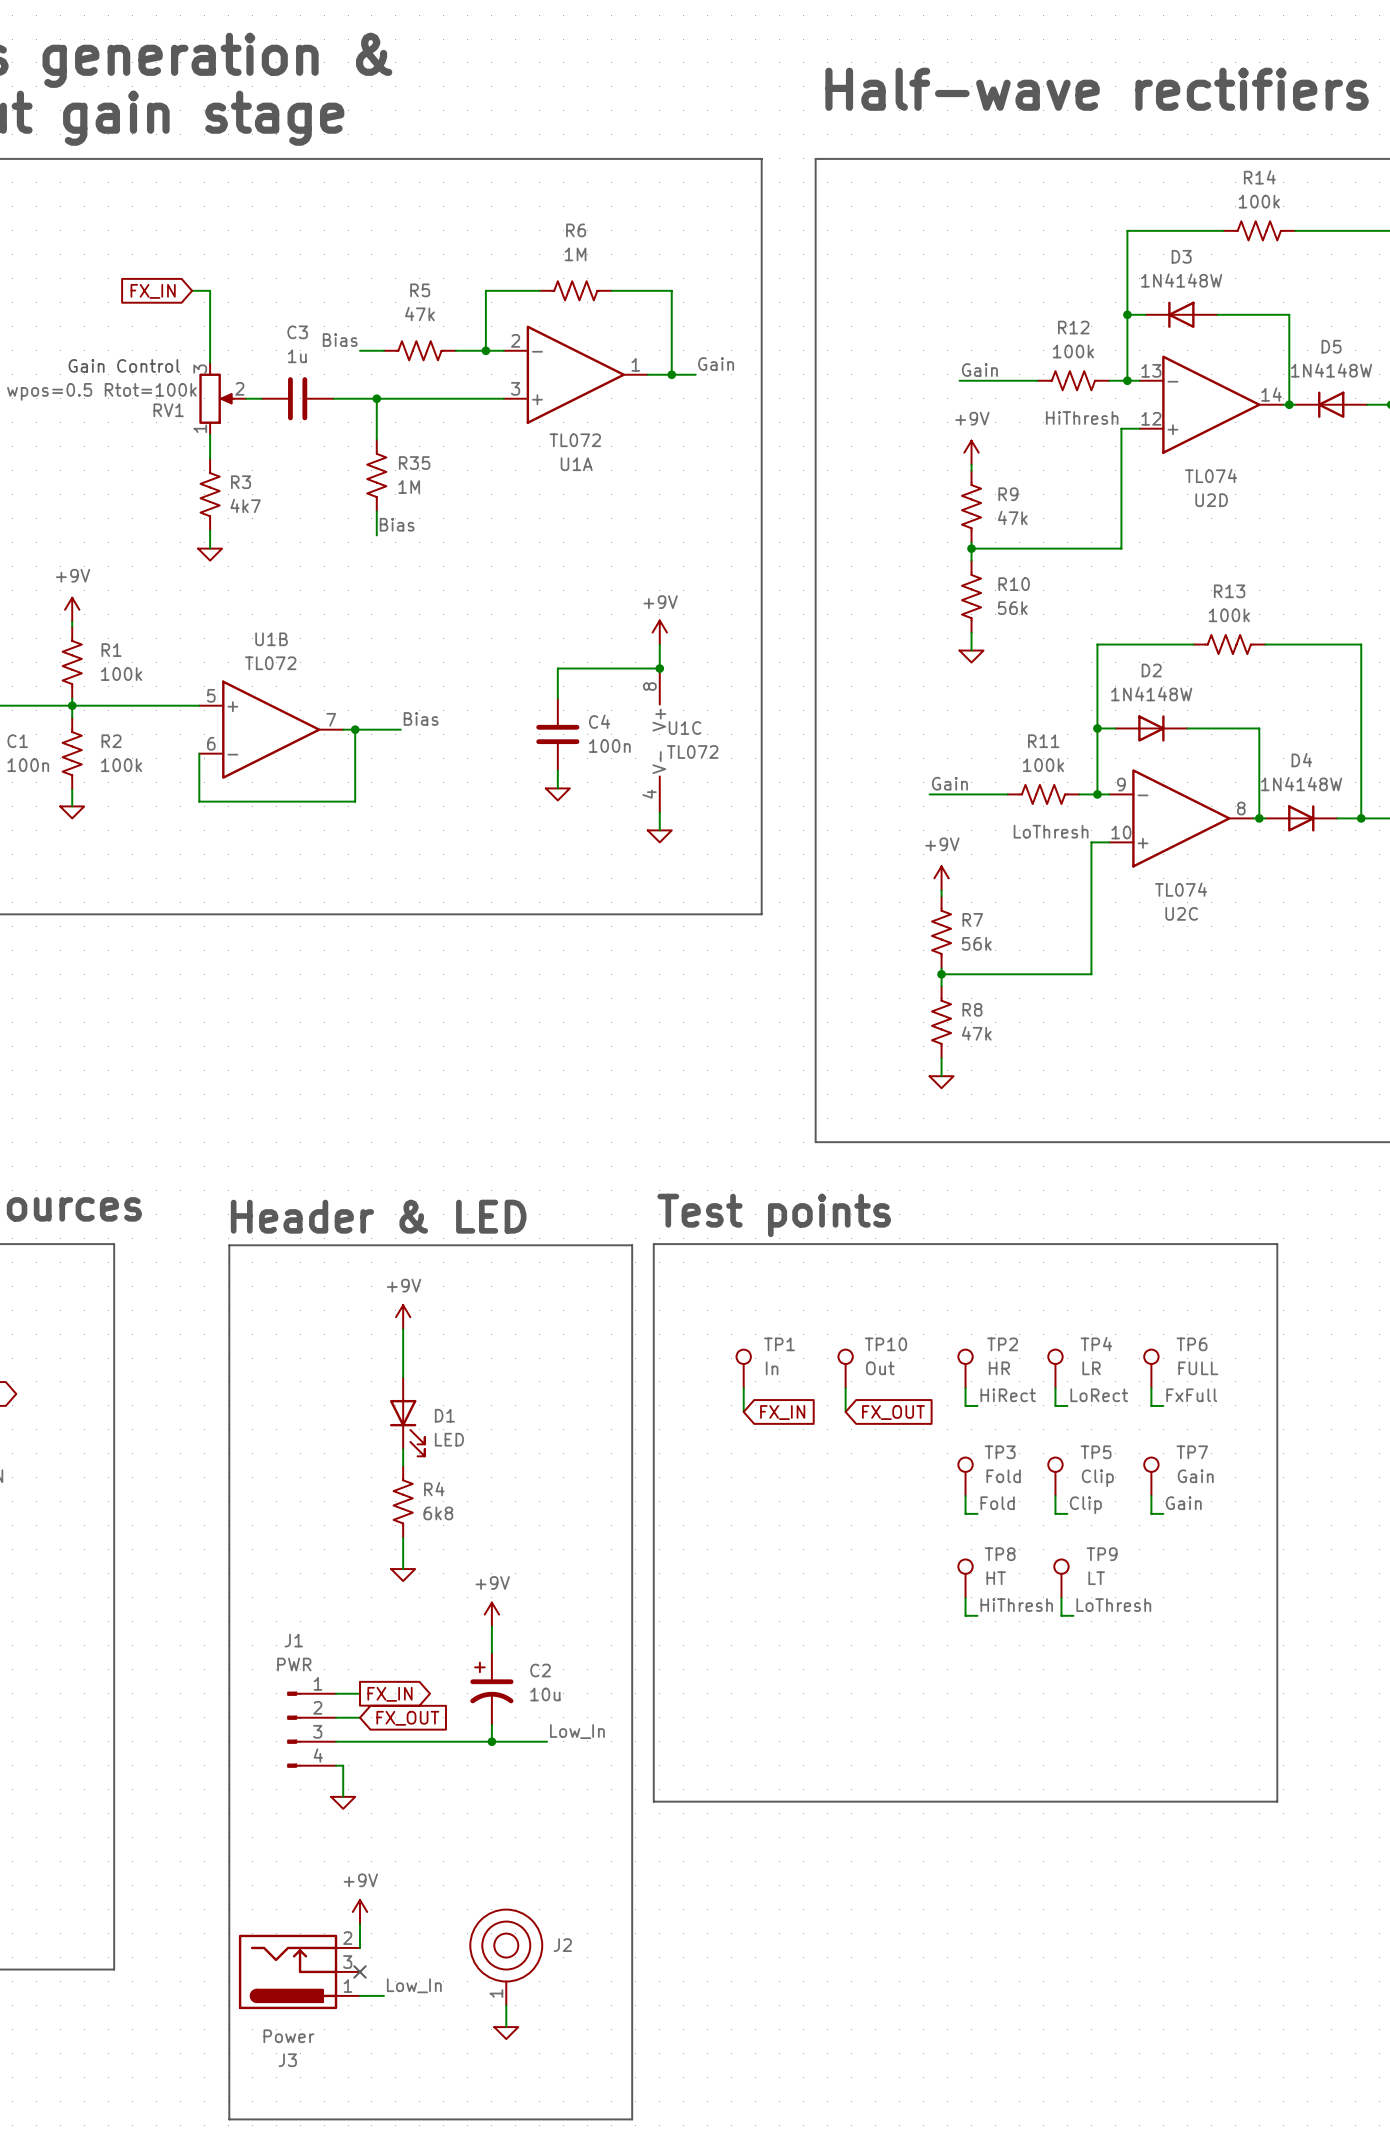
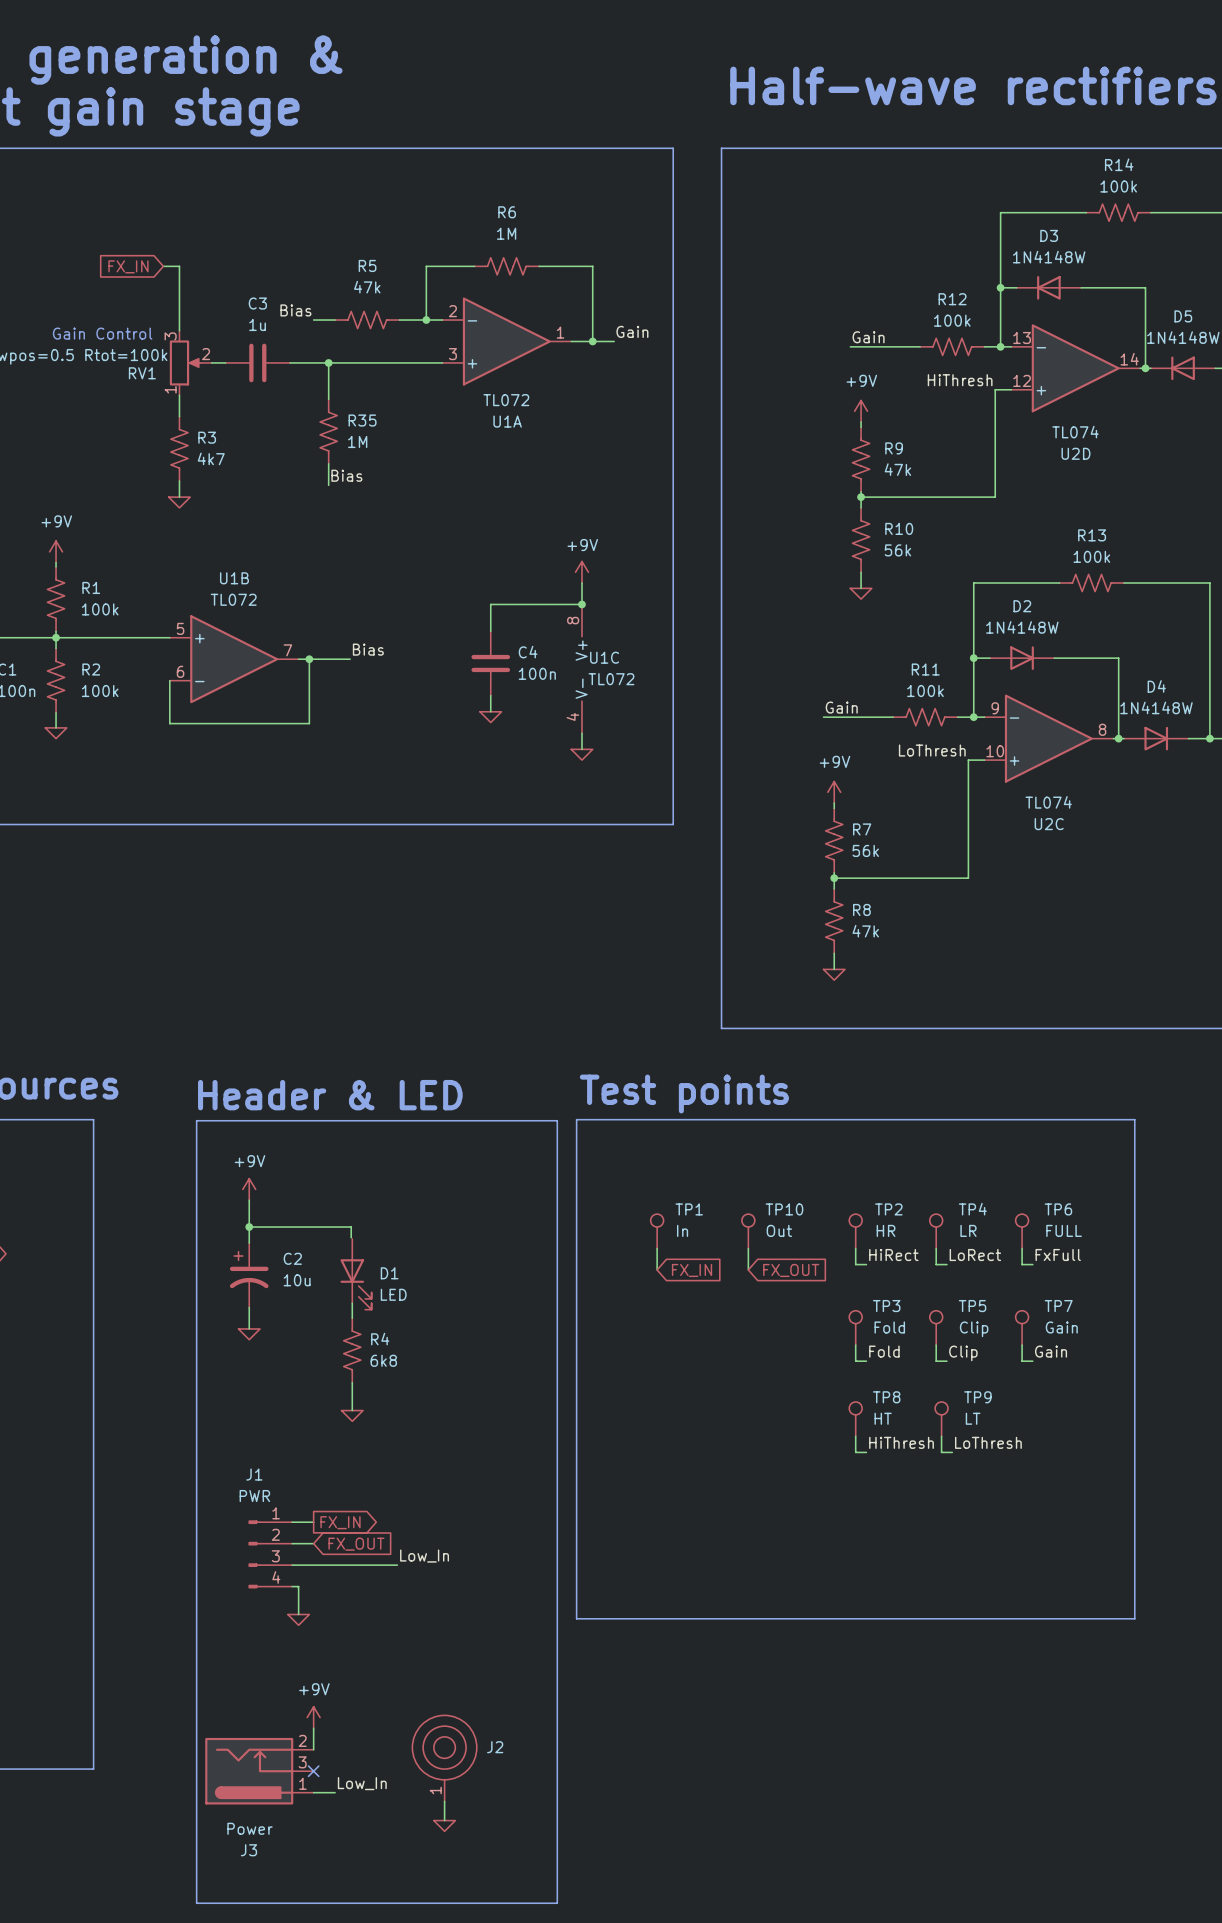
power symbol position: +9V (403, 1317) -> +9V (249, 1189)
wire: (403, 1329) (403, 1377) -> (249, 1200) (249, 1243)
wire: none -> (249, 1227) (351, 1227) (351, 1237)
junction: none -> (249, 1227)
wire: none -> (249, 1307) (249, 1328)
power symbol: none -> (249, 1334)
power symbol: +9V (491, 1614) -> none
wire: (491, 1626) (491, 1652) -> none
C2 position: (491, 1688) -> (249, 1275)
wire: (491, 1724) (491, 1741) -> none
label position: Low_In (577, 1731) -> Low_In (424, 1556)
wire: (453, 1741) (547, 1741) -> none
junction: (491, 1741) -> none

